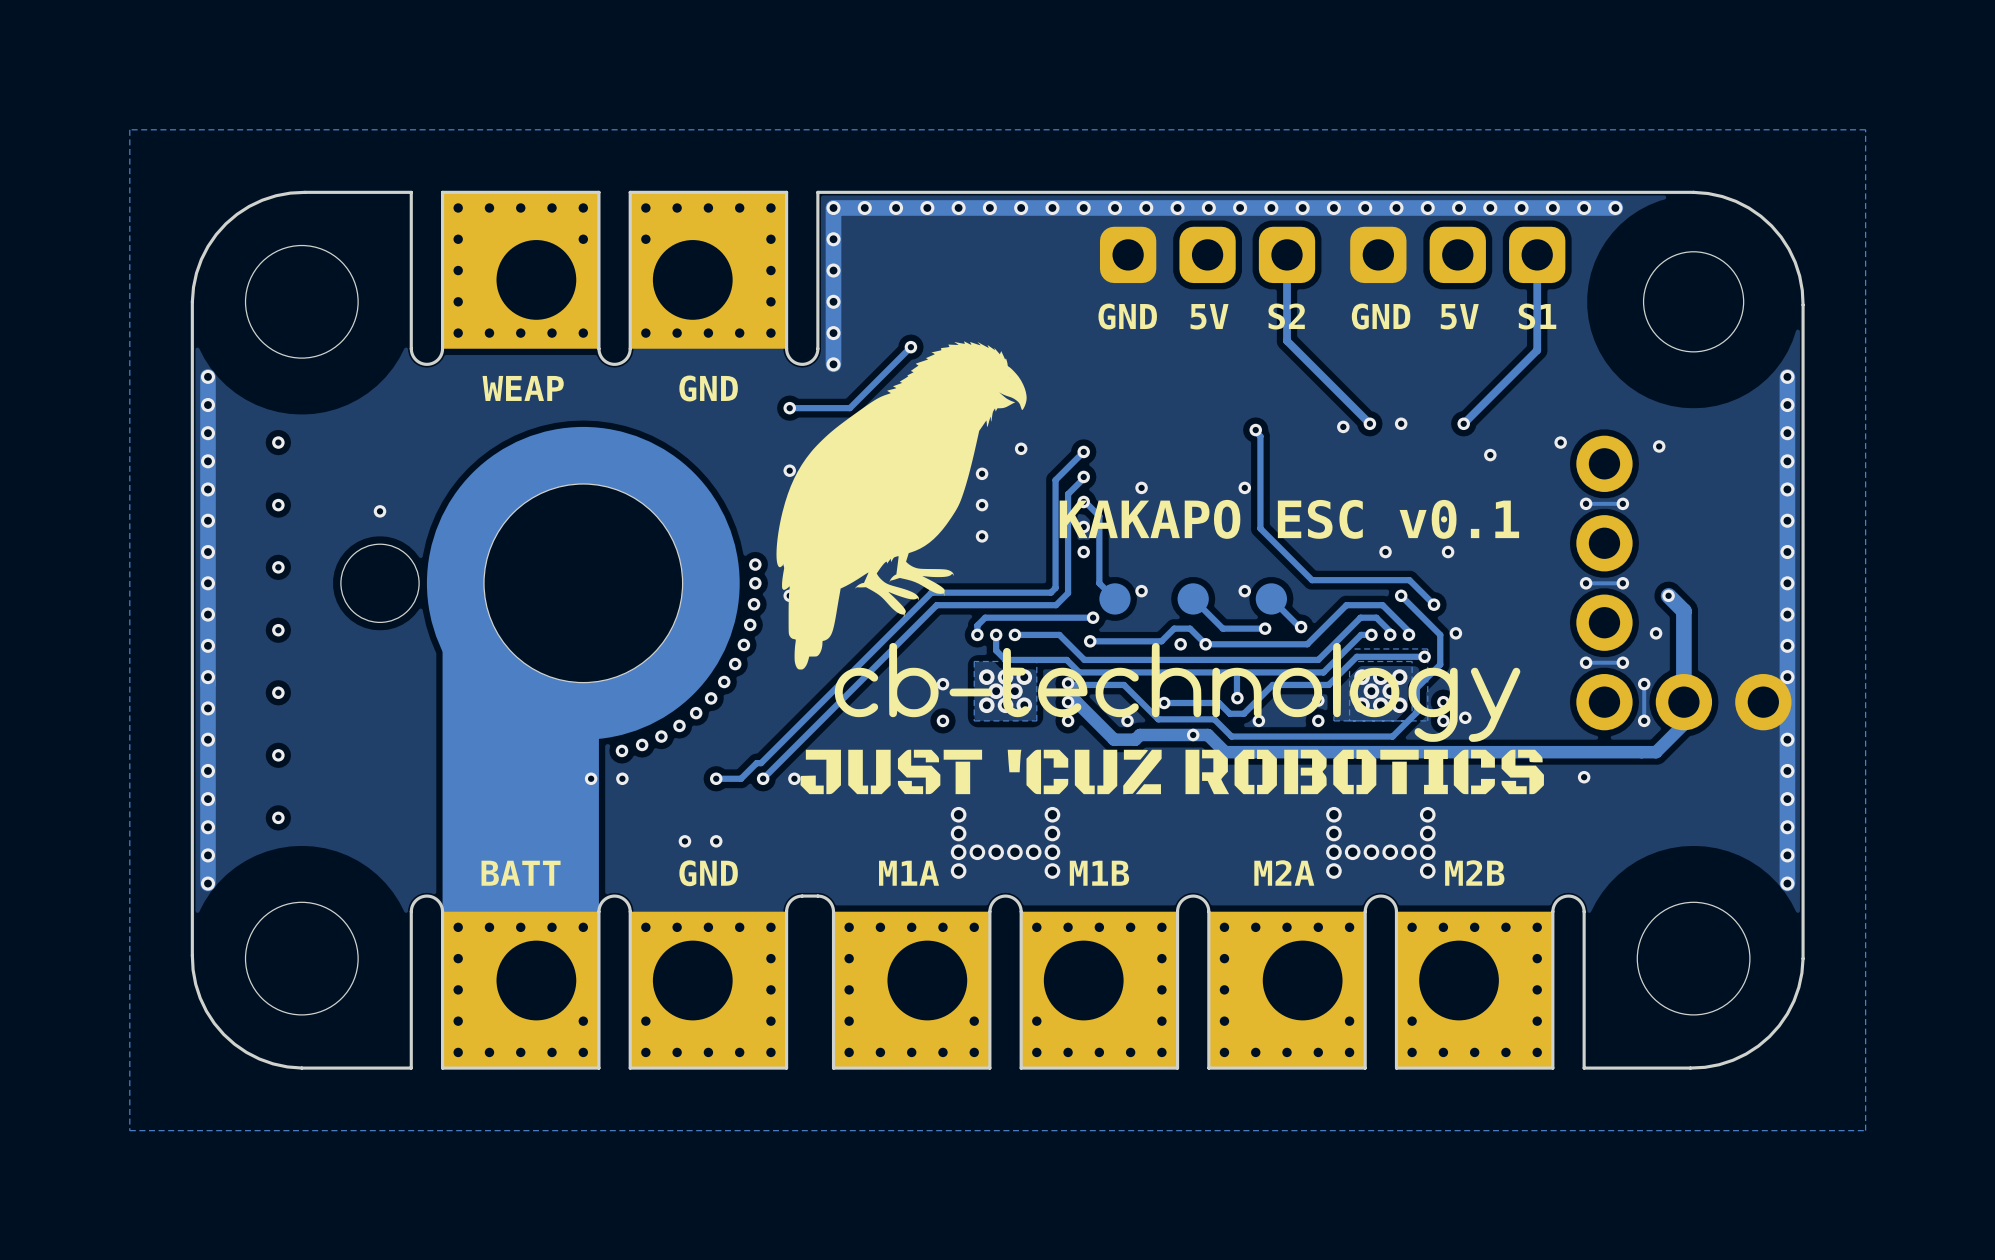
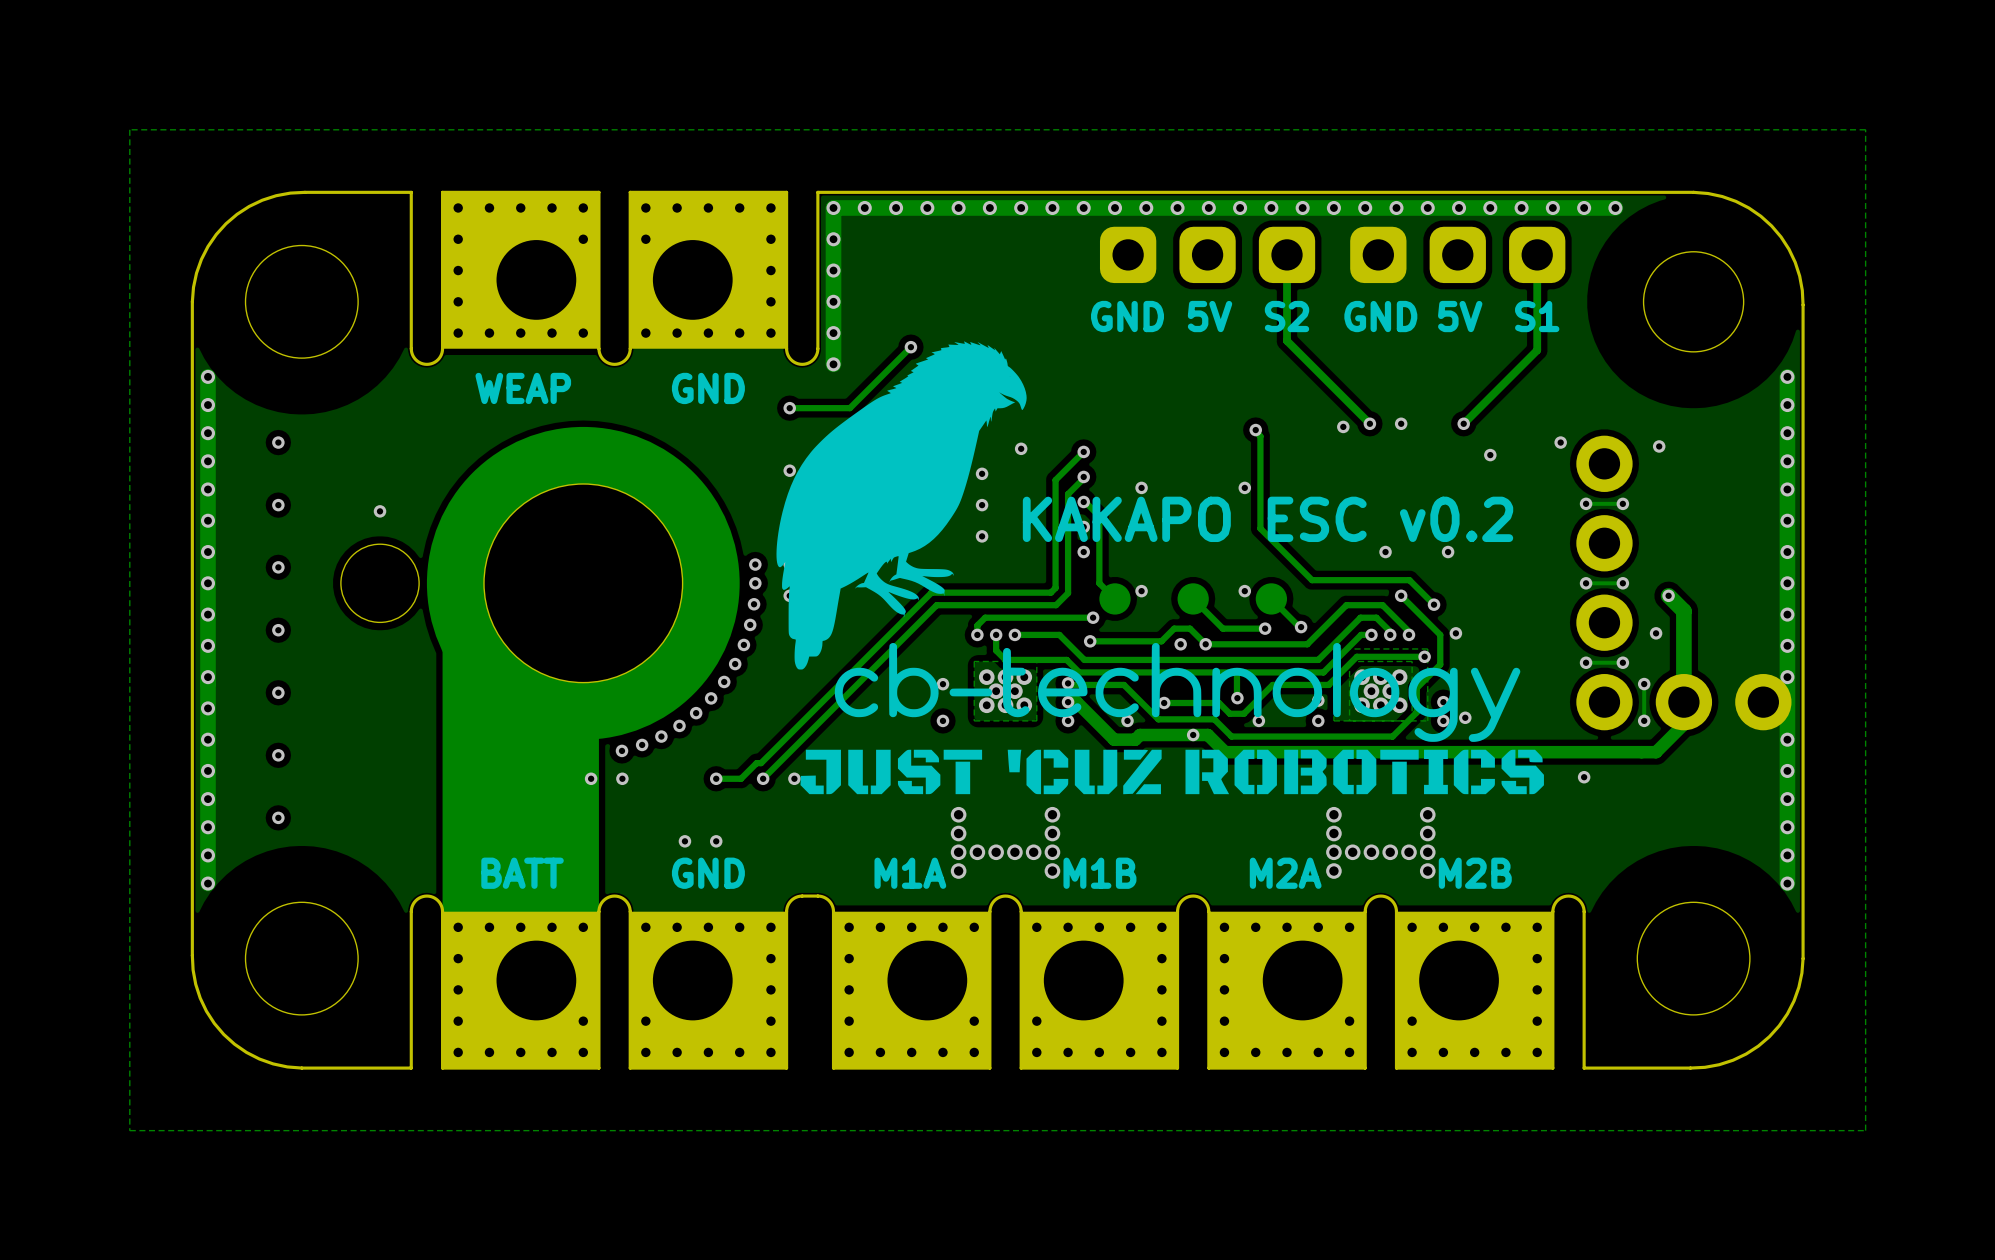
text: KAKAPO ESC v0.1 (1289, 519) -> KAKAPO ESC v0.2 (1268, 519)

